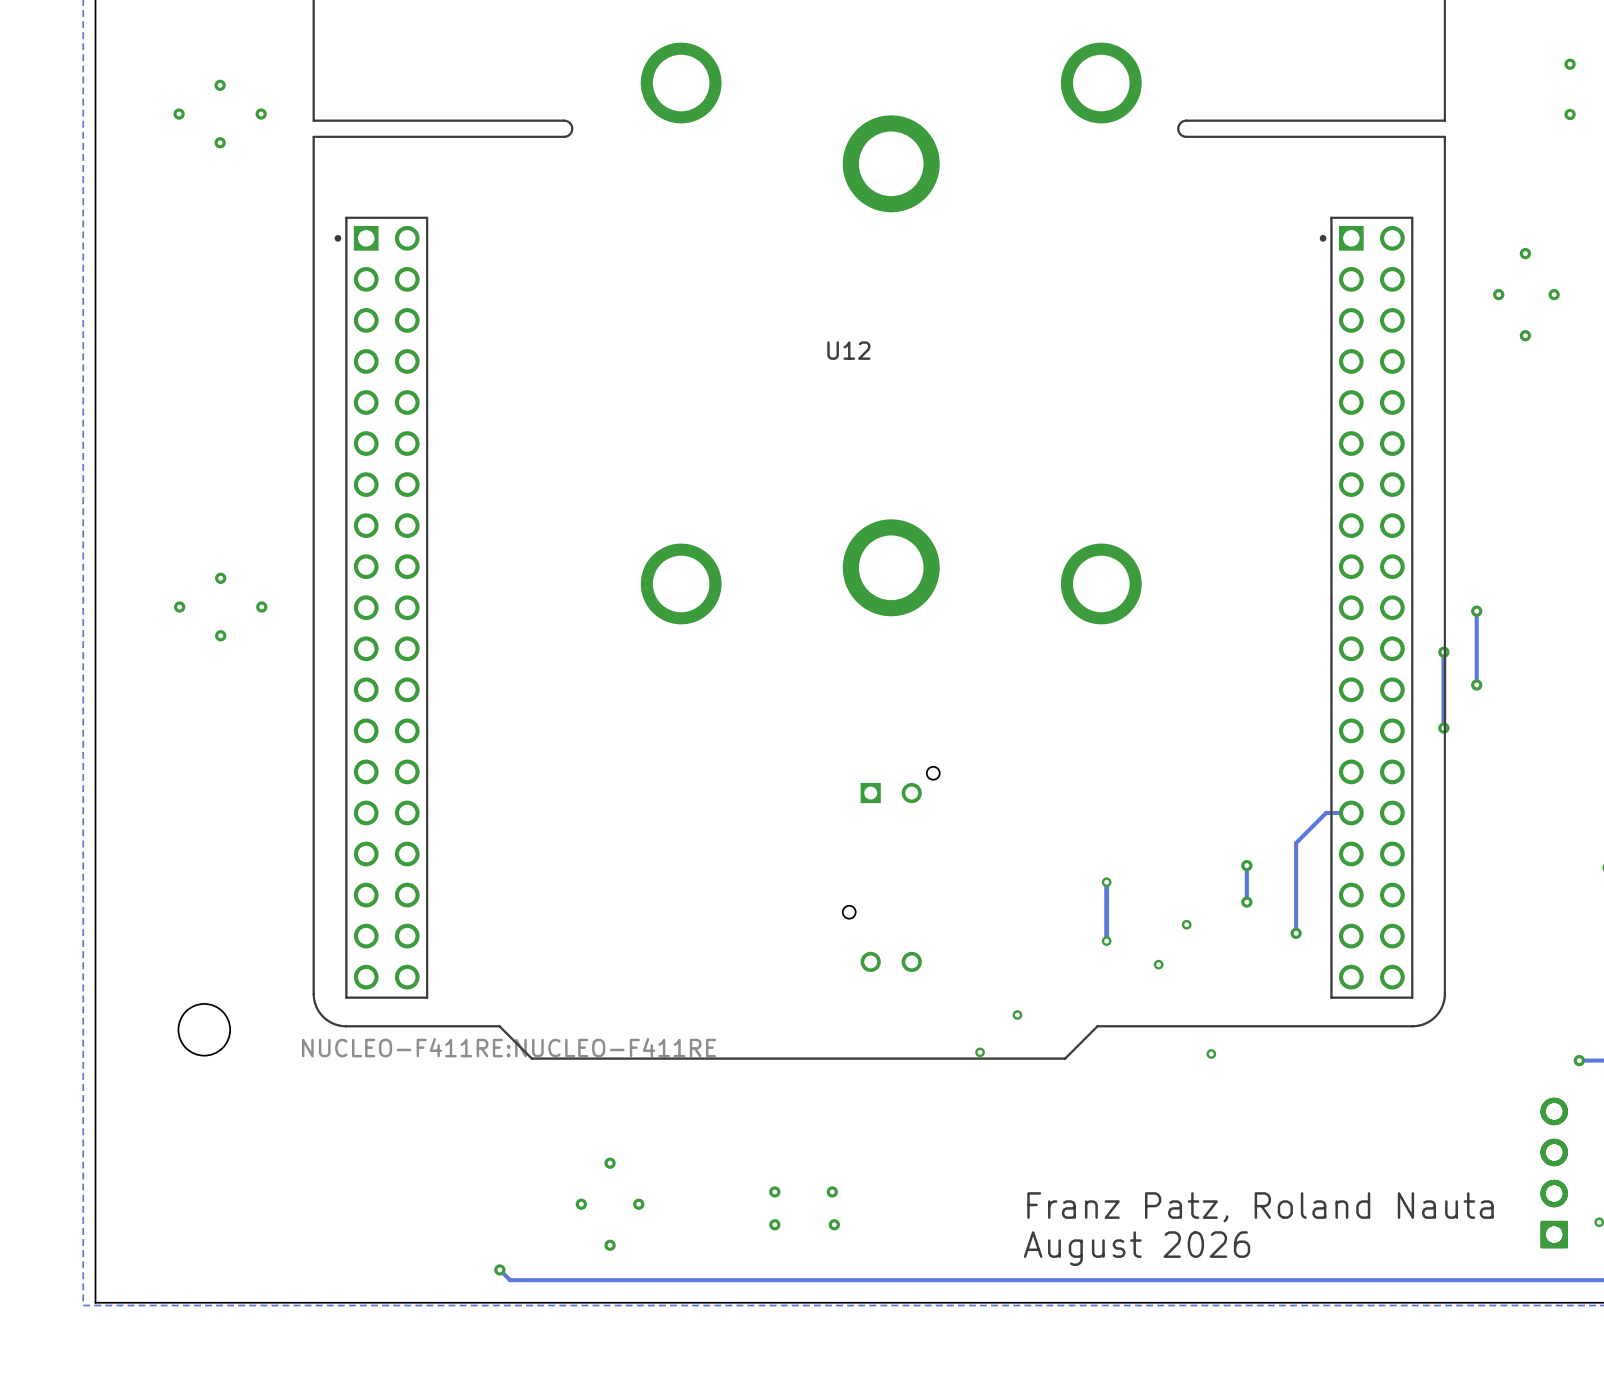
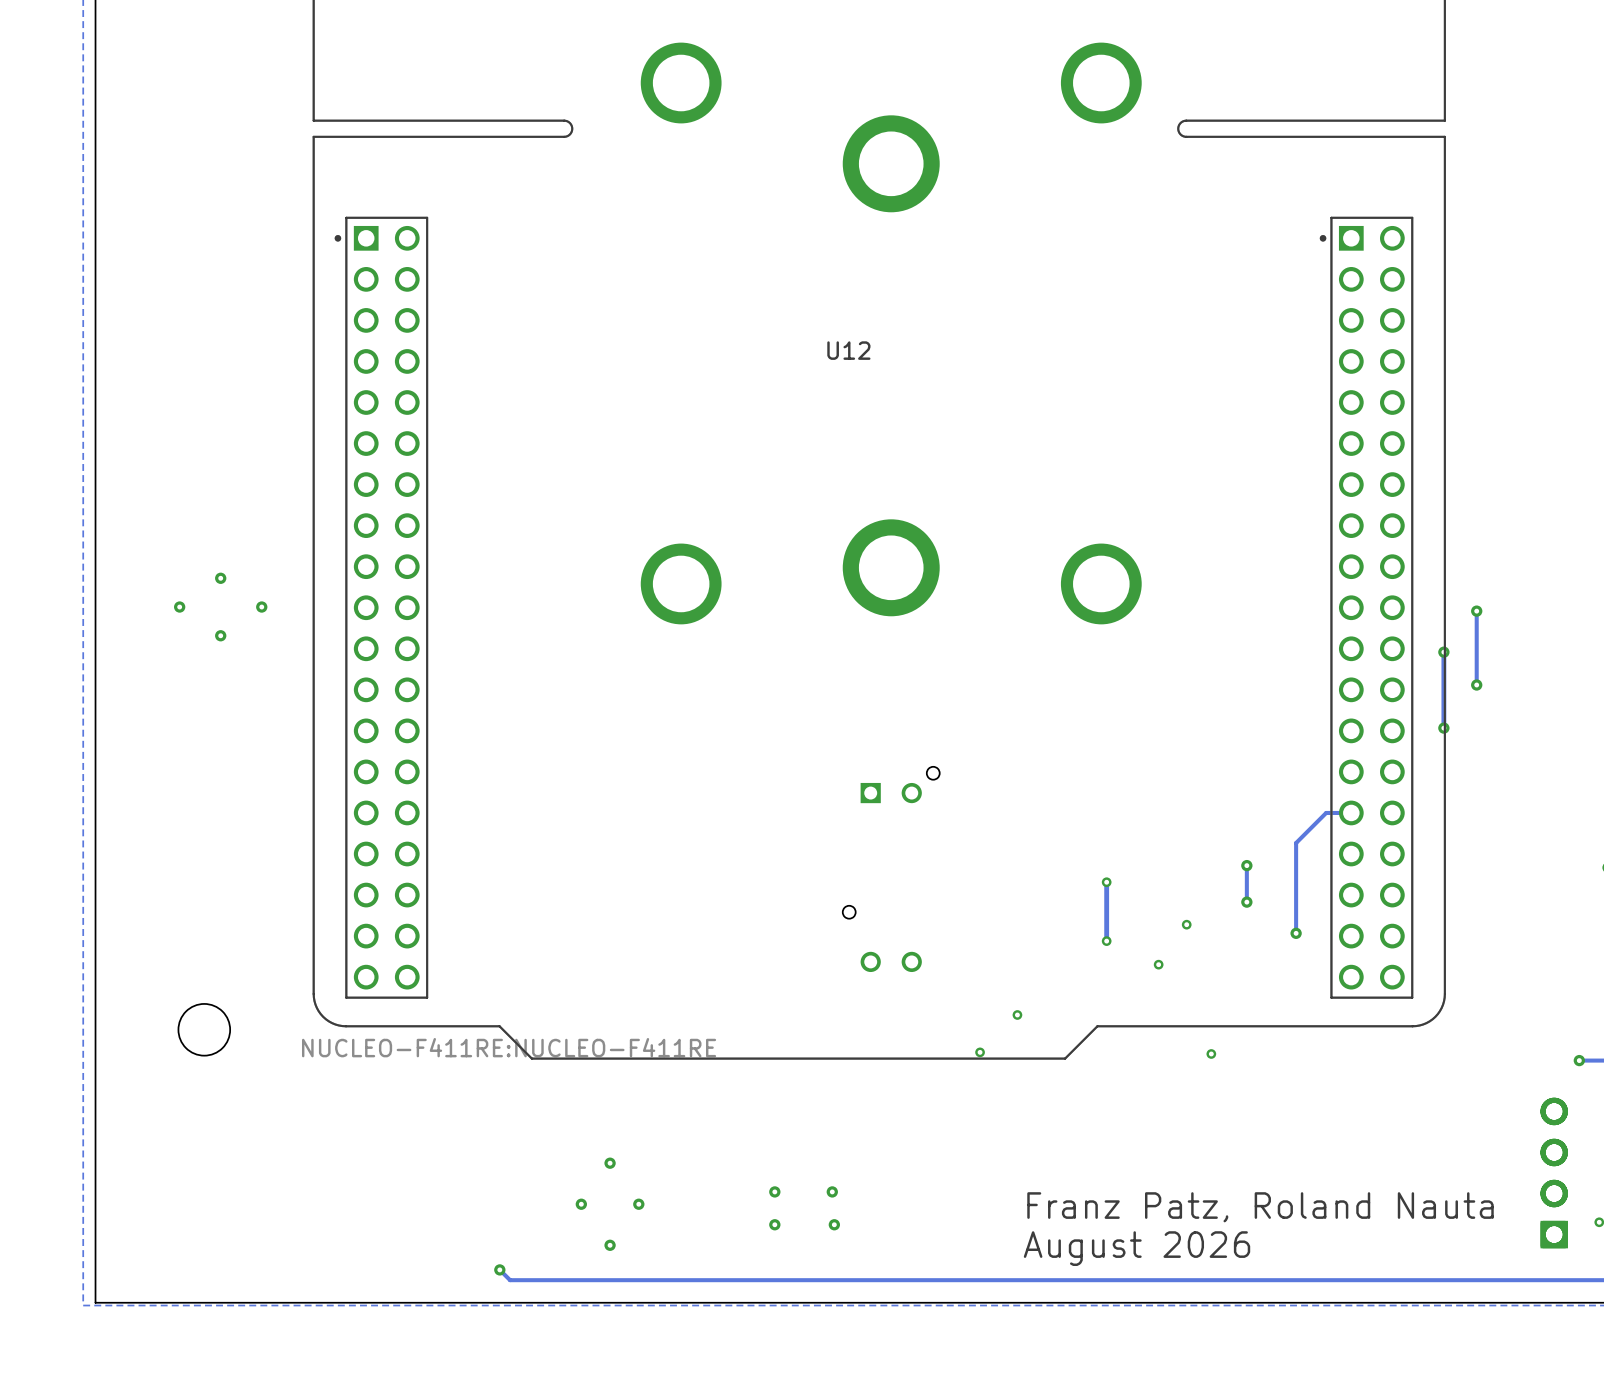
via: (1570, 64) -> none
via: (220, 85) -> none
via: (179, 114) -> none
via: (261, 114) -> none
via: (1570, 114) -> none
via: (220, 142) -> none
via: (1525, 253) -> none
via: (1498, 294) -> none
via: (1554, 294) -> none
via: (1525, 335) -> none

